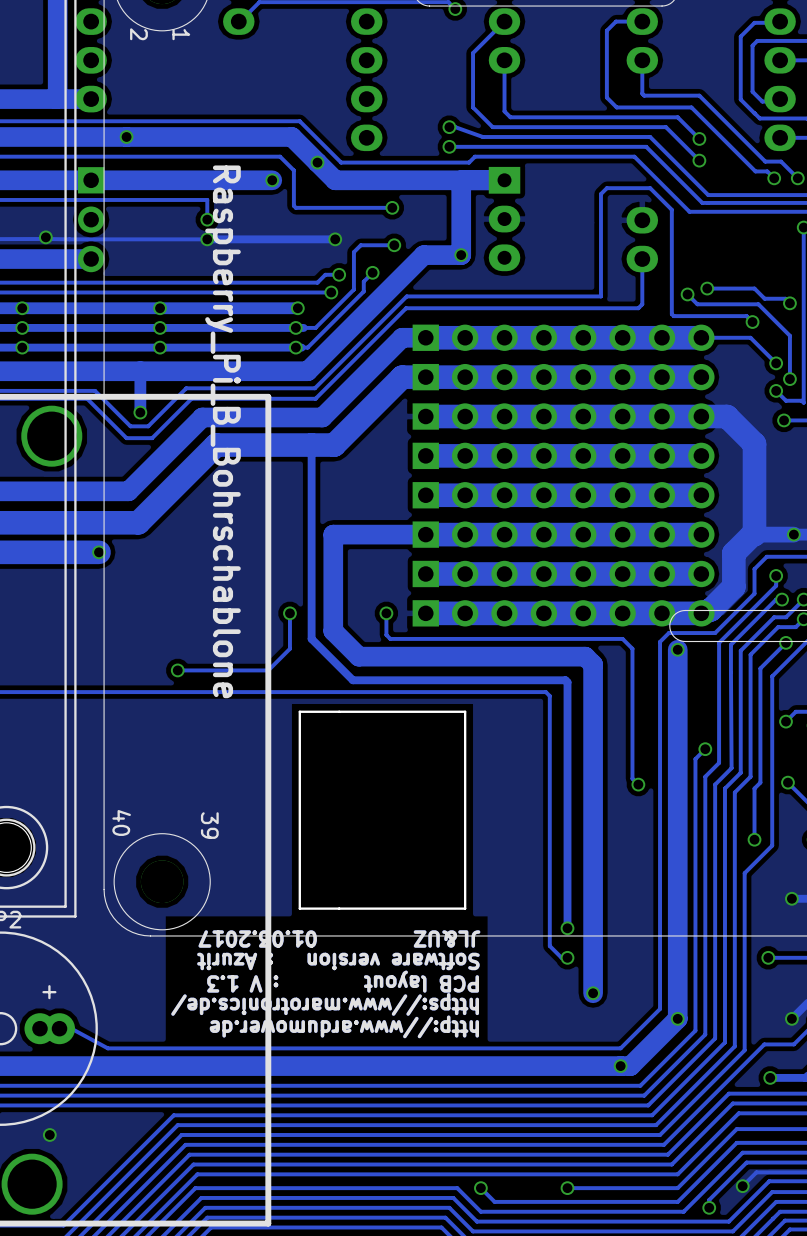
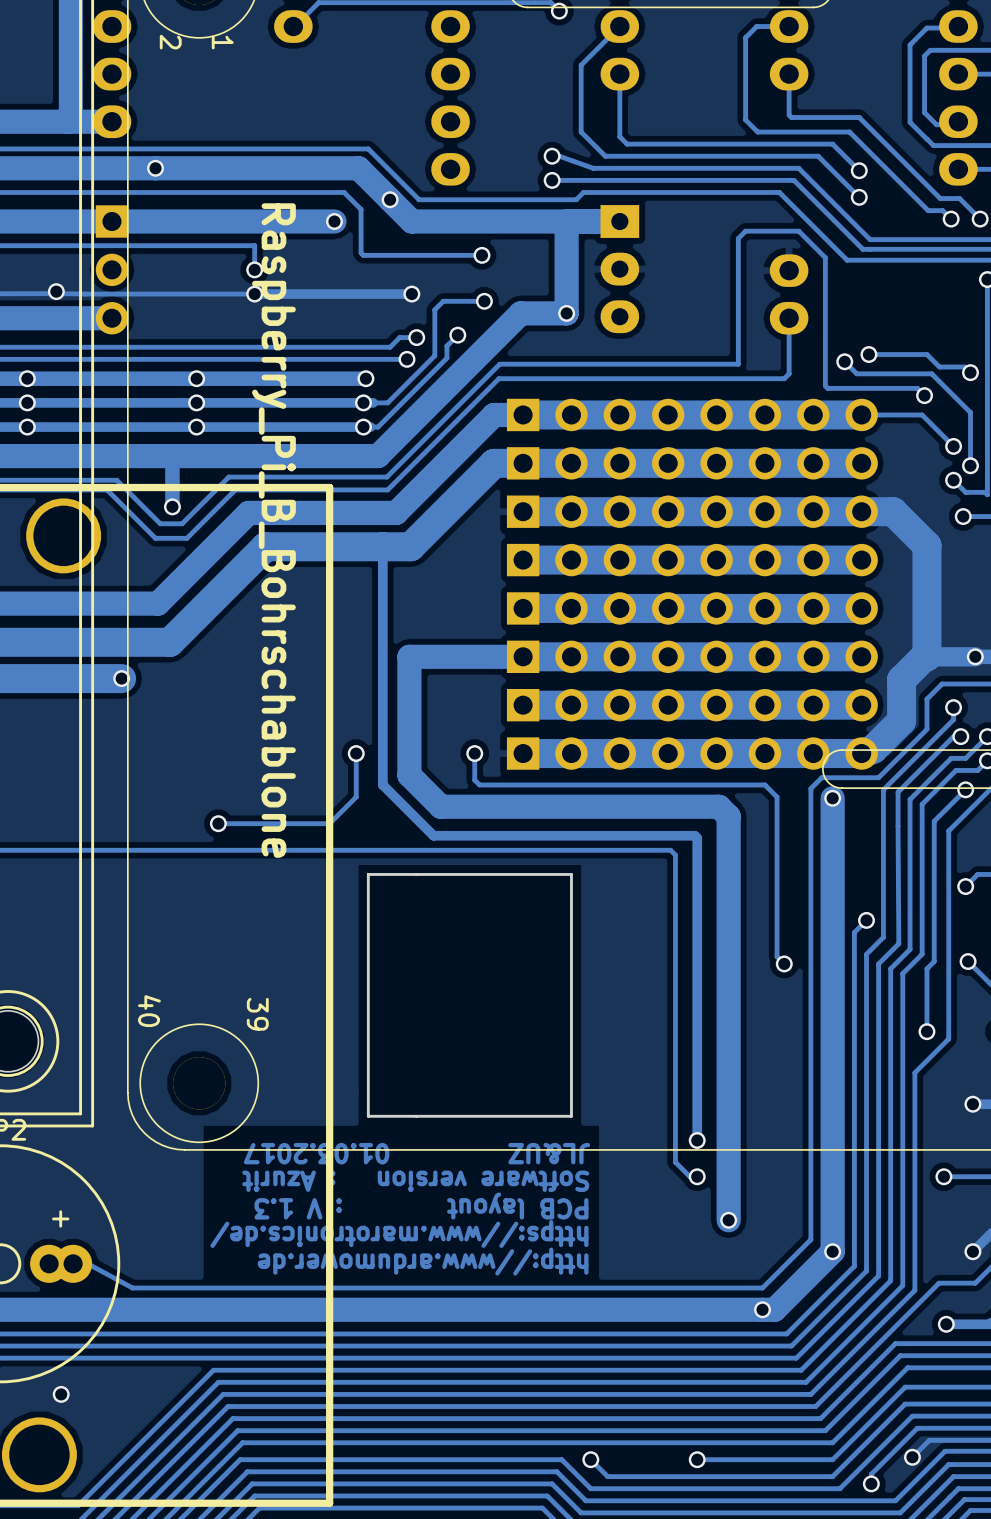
text: JL&UZ 01.03.2017 (339, 939) -> none
text: Software version : Azurit (338, 961) -> none
text: PCB layout : V 1.3 (343, 981) -> none
text: https://www.marotronics.de/ (325, 1004) -> none
text: http://www.ardumower.de (344, 1026) -> none

